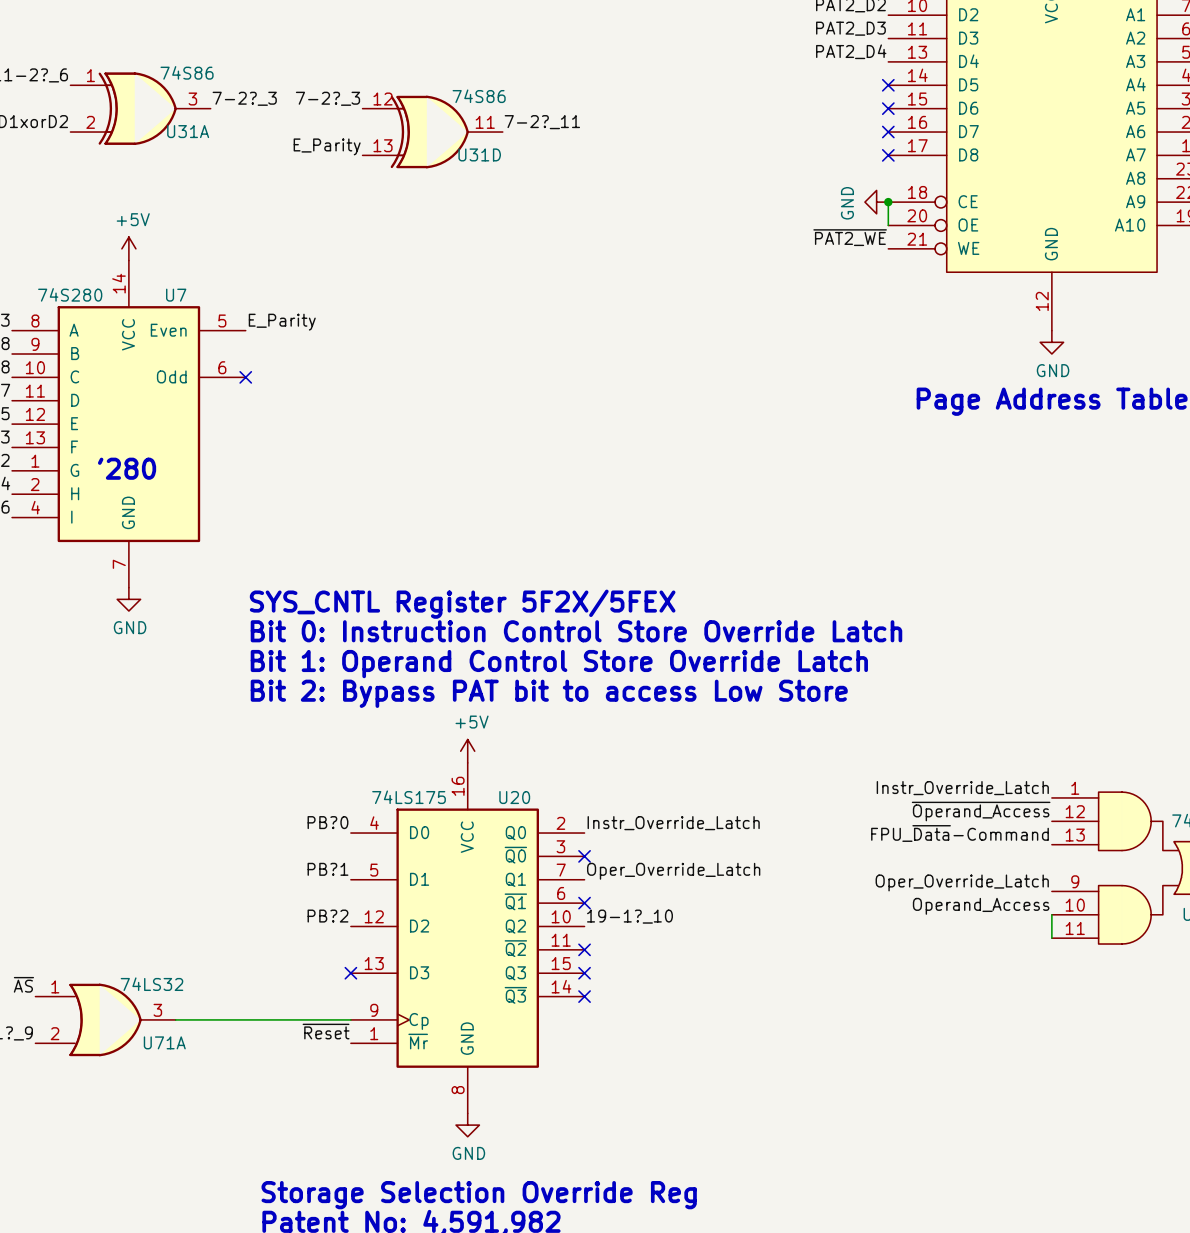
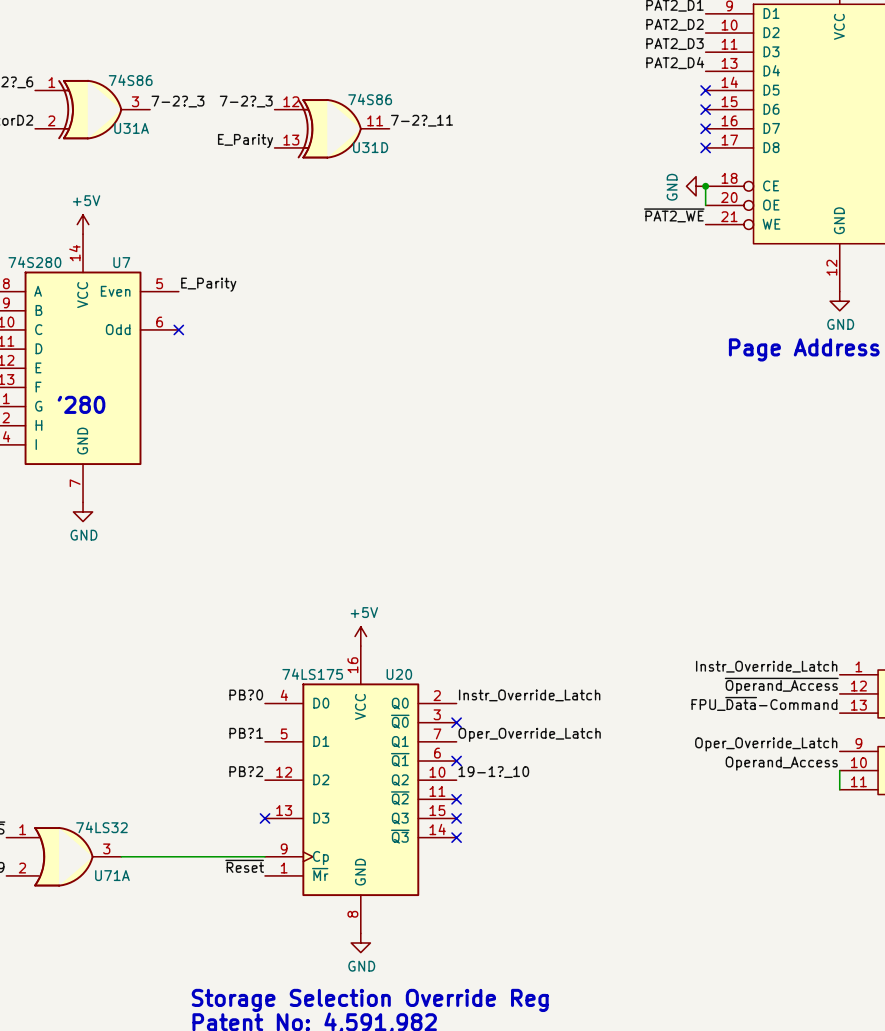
text: SYS_CNTL Register 5F2X/5FEX (462, 604) -> none
text: Bit 0: Instruction Control Store Override Latch (576, 631) -> none
text: Bit 1: Operand Control Store Override Latch (559, 664) -> none
text: Bit 2: Bypass PAT bit to access Low Store (549, 693) -> none

